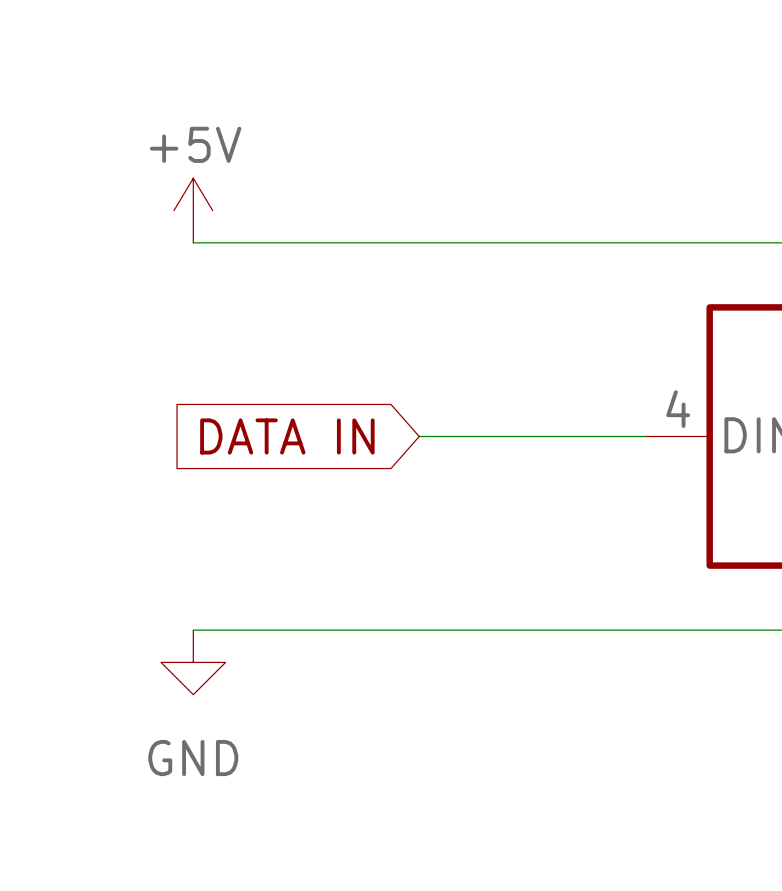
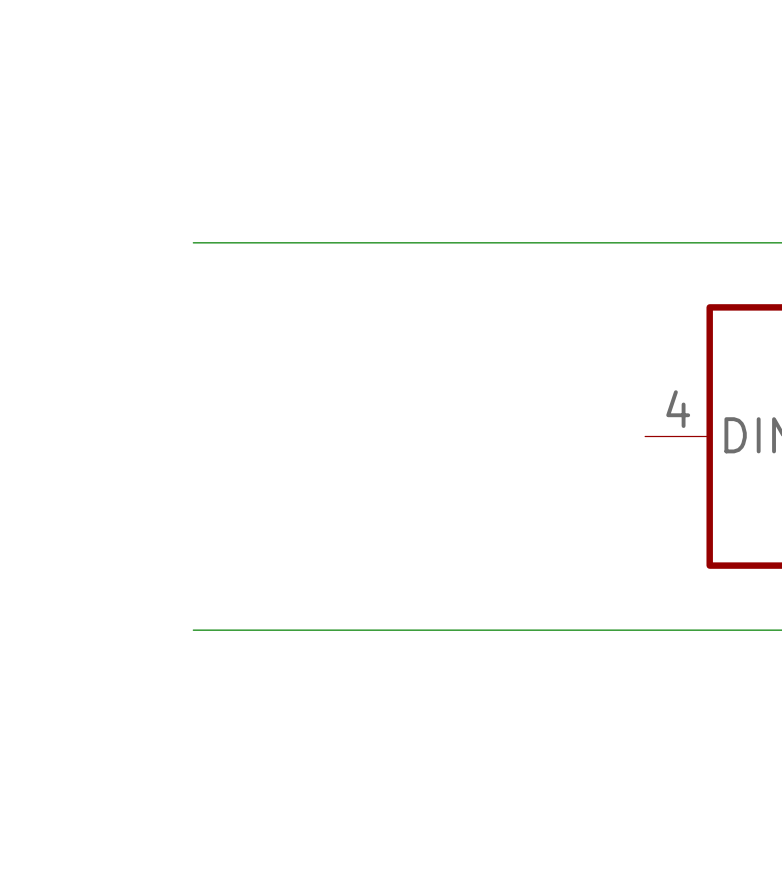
power symbol: +5V (193, 210) -> none
global label: DATA IN (287, 436) -> none
wire: (419, 436) (645, 436) -> none
power symbol: GND (193, 662) -> none

